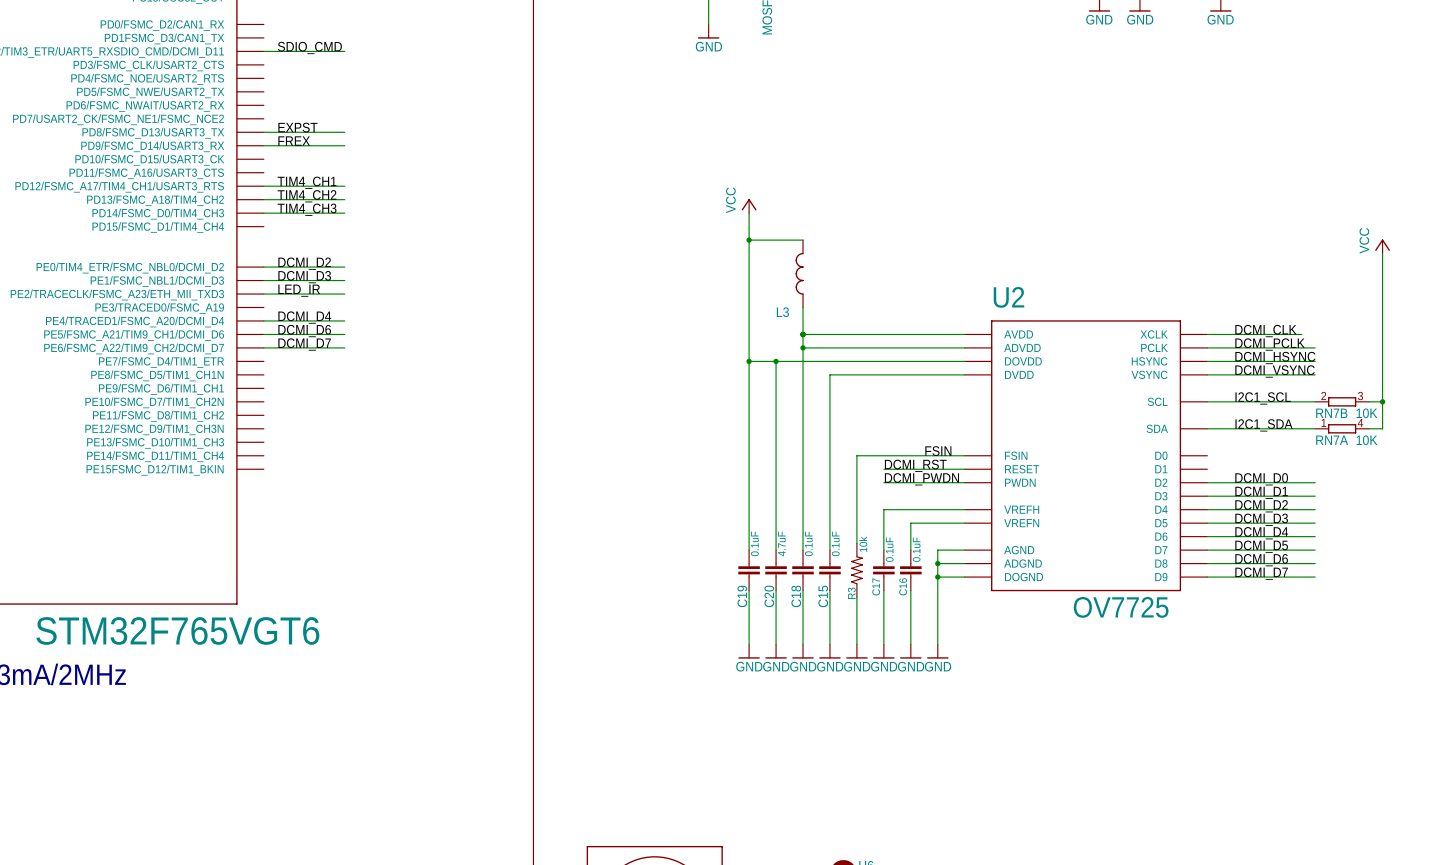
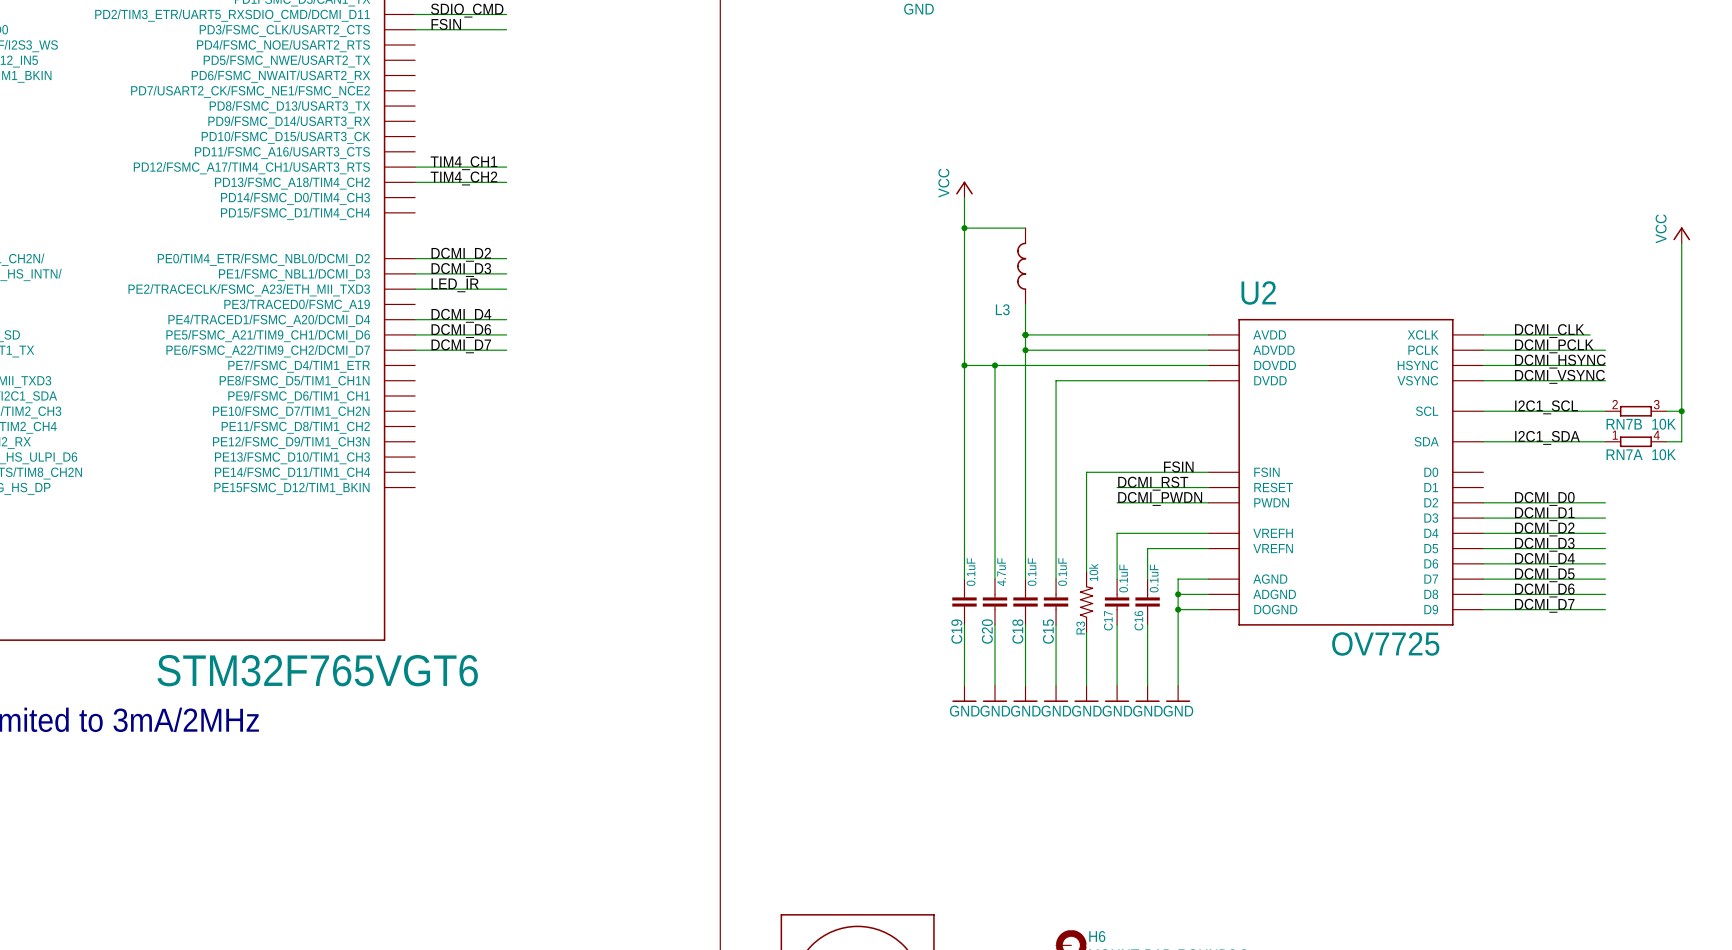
label: none -> FSIN (446, 24)
label: EXPST (297, 127) -> none
wire: (263, 132) (344, 132) -> (415, 29) (506, 29)
label: FREX (294, 141) -> none
wire: (263, 145) (344, 145) -> none
label: TIM4_CH3 (307, 209) -> none
wire: (263, 213) (344, 213) -> none

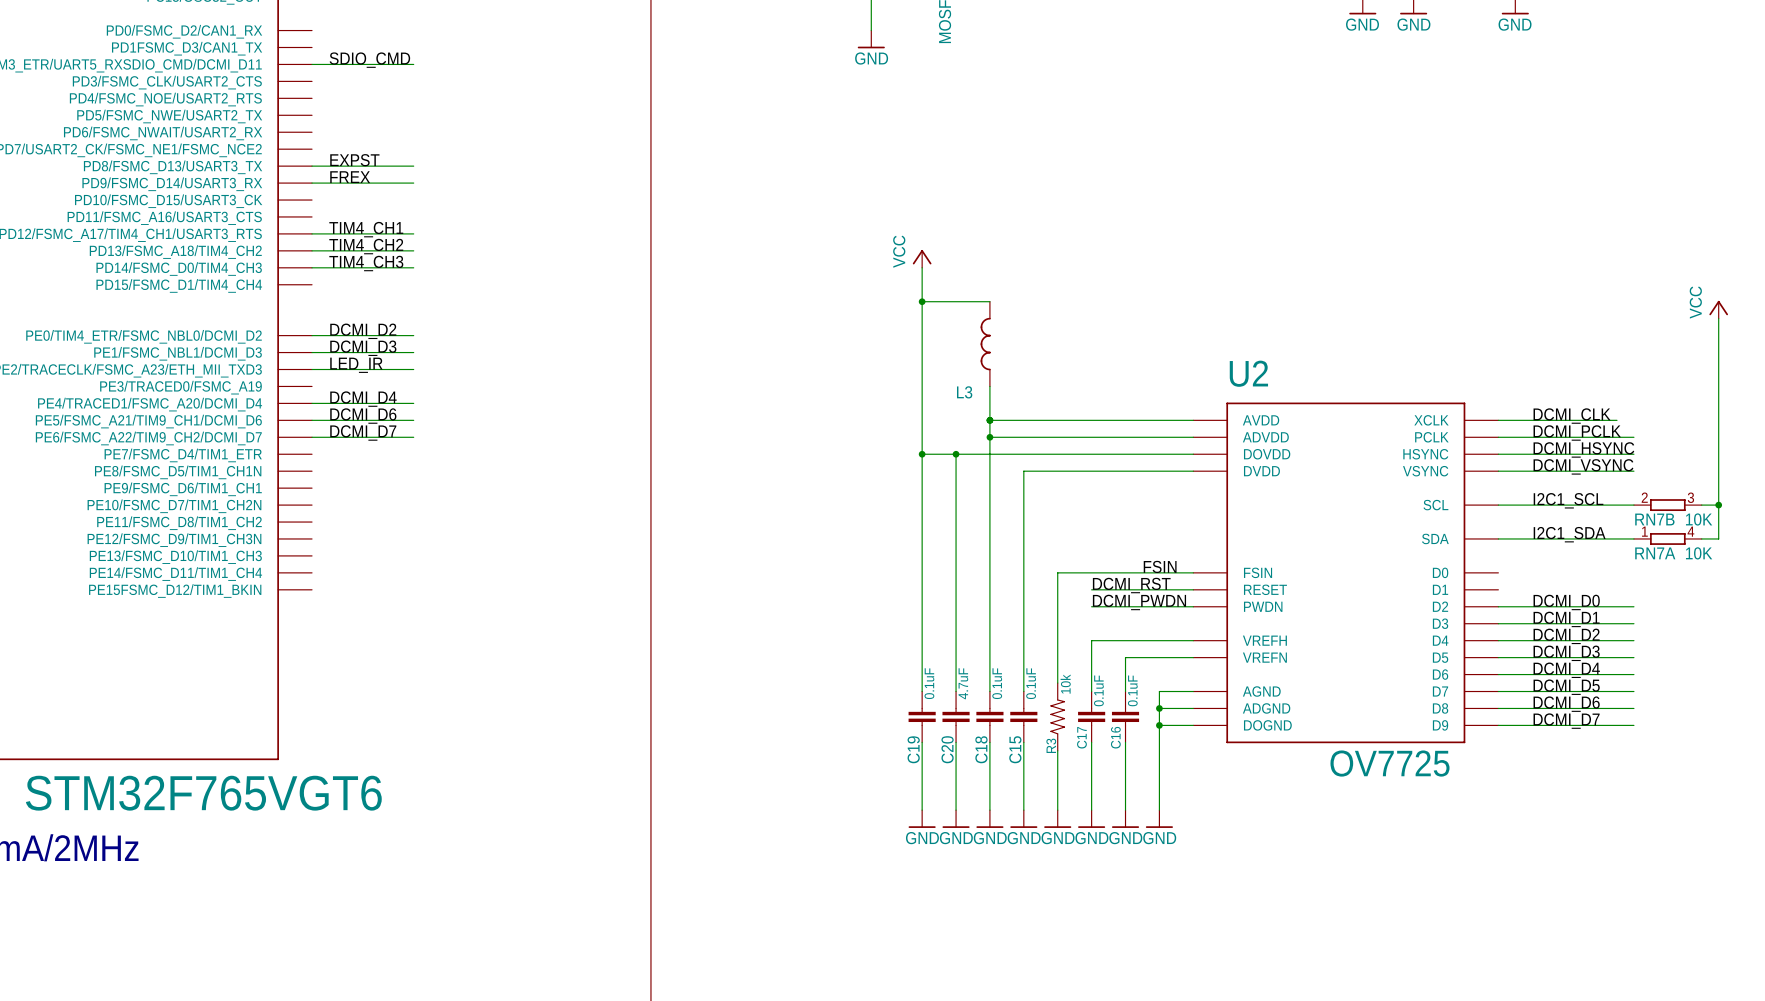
label: FSIN (446, 24) -> none
wire: (415, 29) (506, 29) -> (312, 166) (413, 166)
label: none -> EXPST (354, 160)
label: none -> FREX (350, 177)
wire: none -> (312, 183) (413, 183)
label: none -> TIM4_CH3 (366, 263)
wire: none -> (312, 267) (413, 267)

